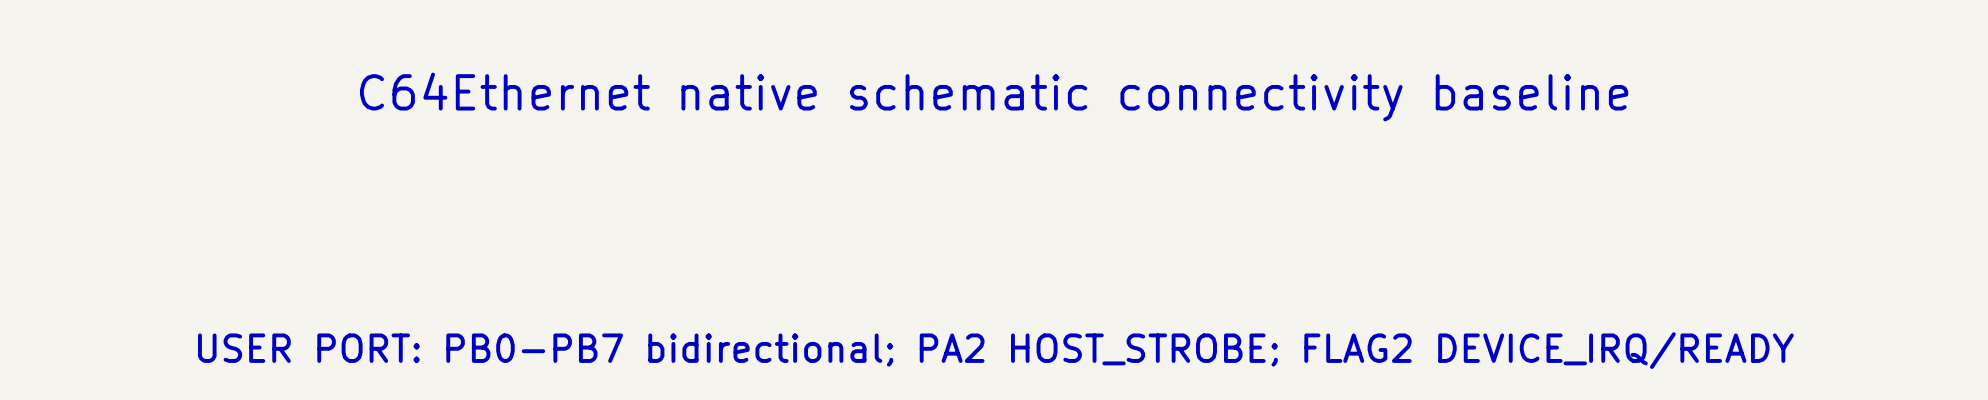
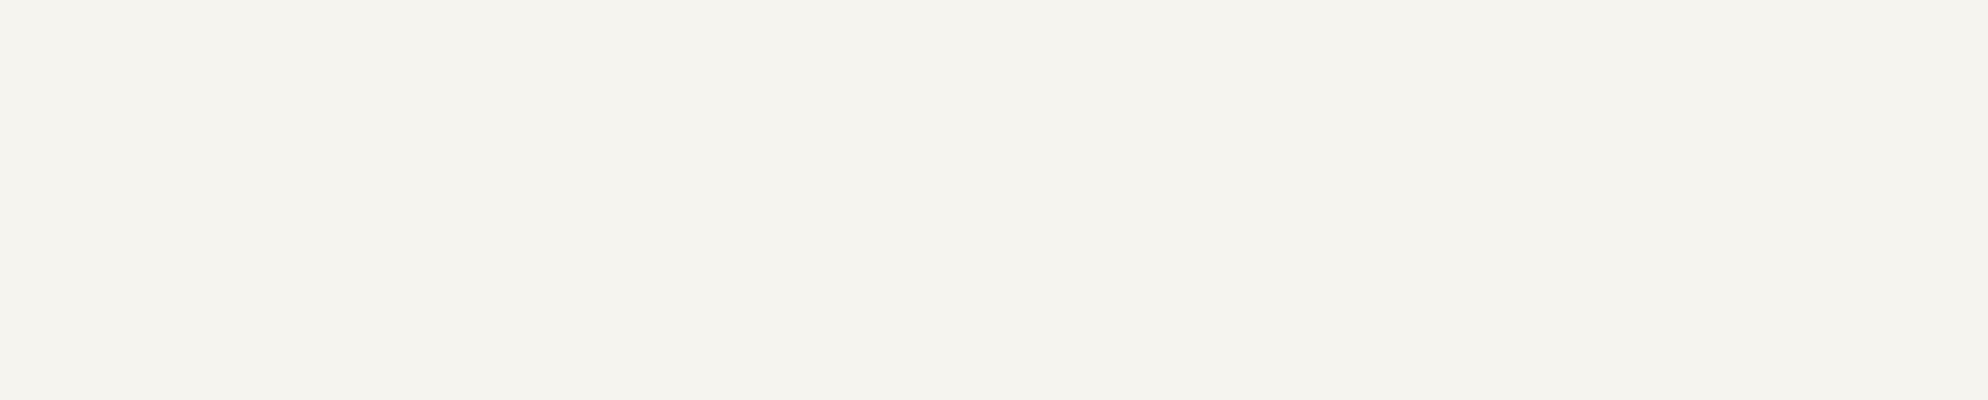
text: C64Ethernet native schematic connectivity baseline (994, 96) -> none
text: USER PORT: PB0-PB7 bidirectional; PA2 HOST_STROBE; FLAG2 DEVICE_IRQ/READY (995, 350) -> none

